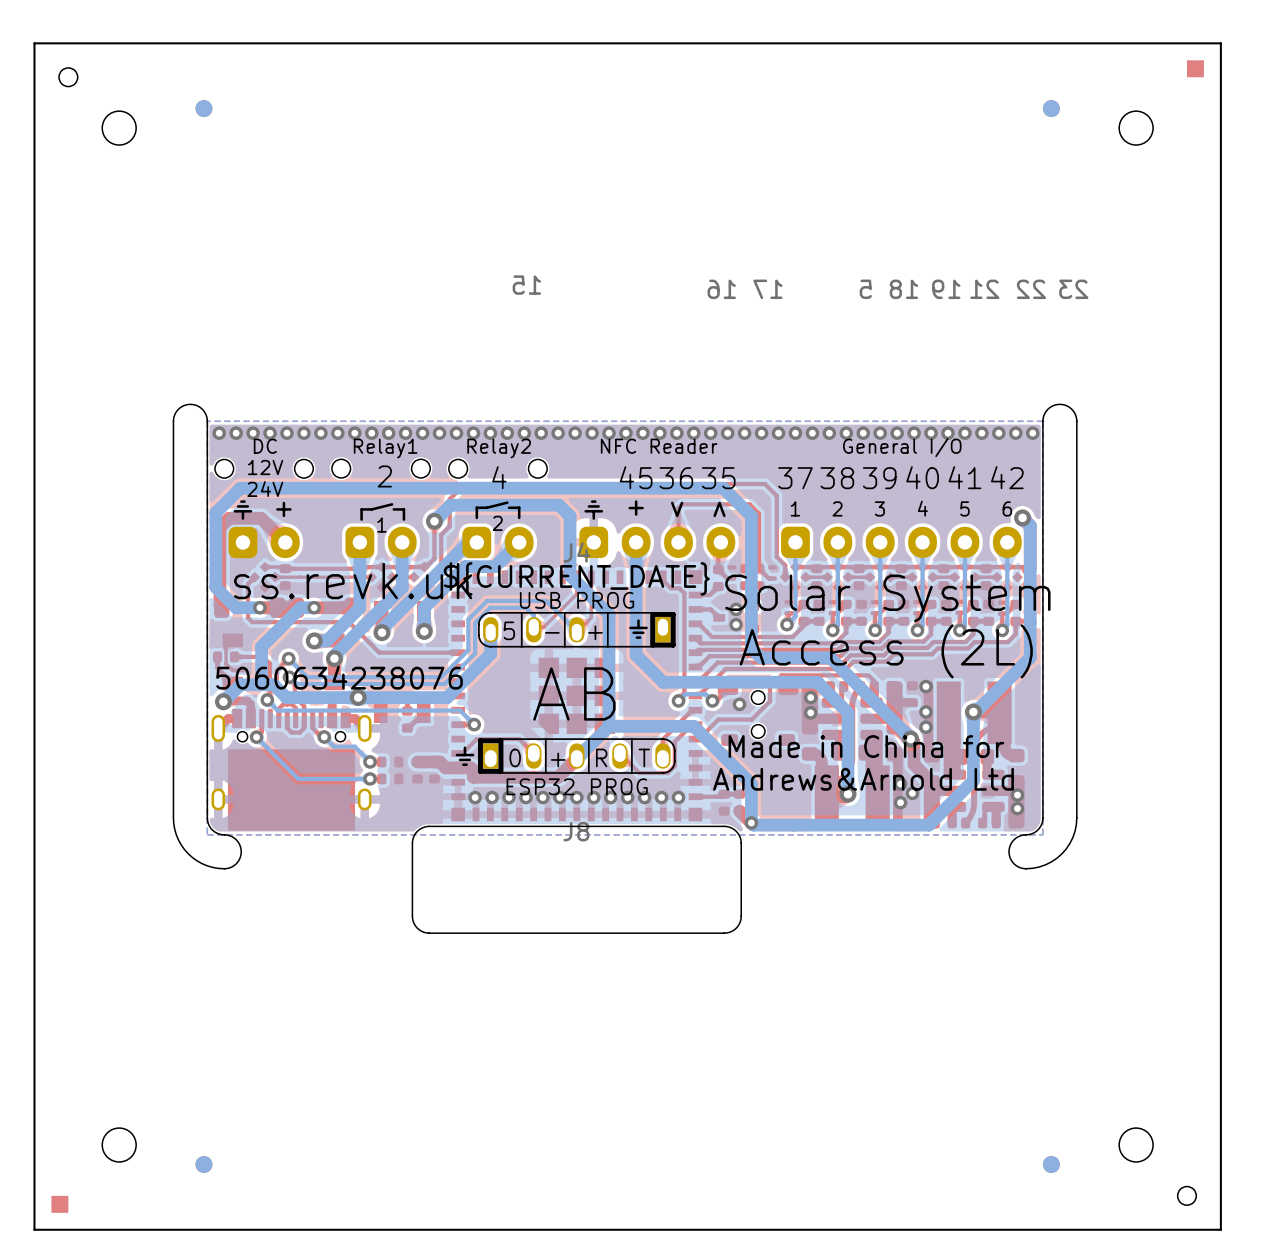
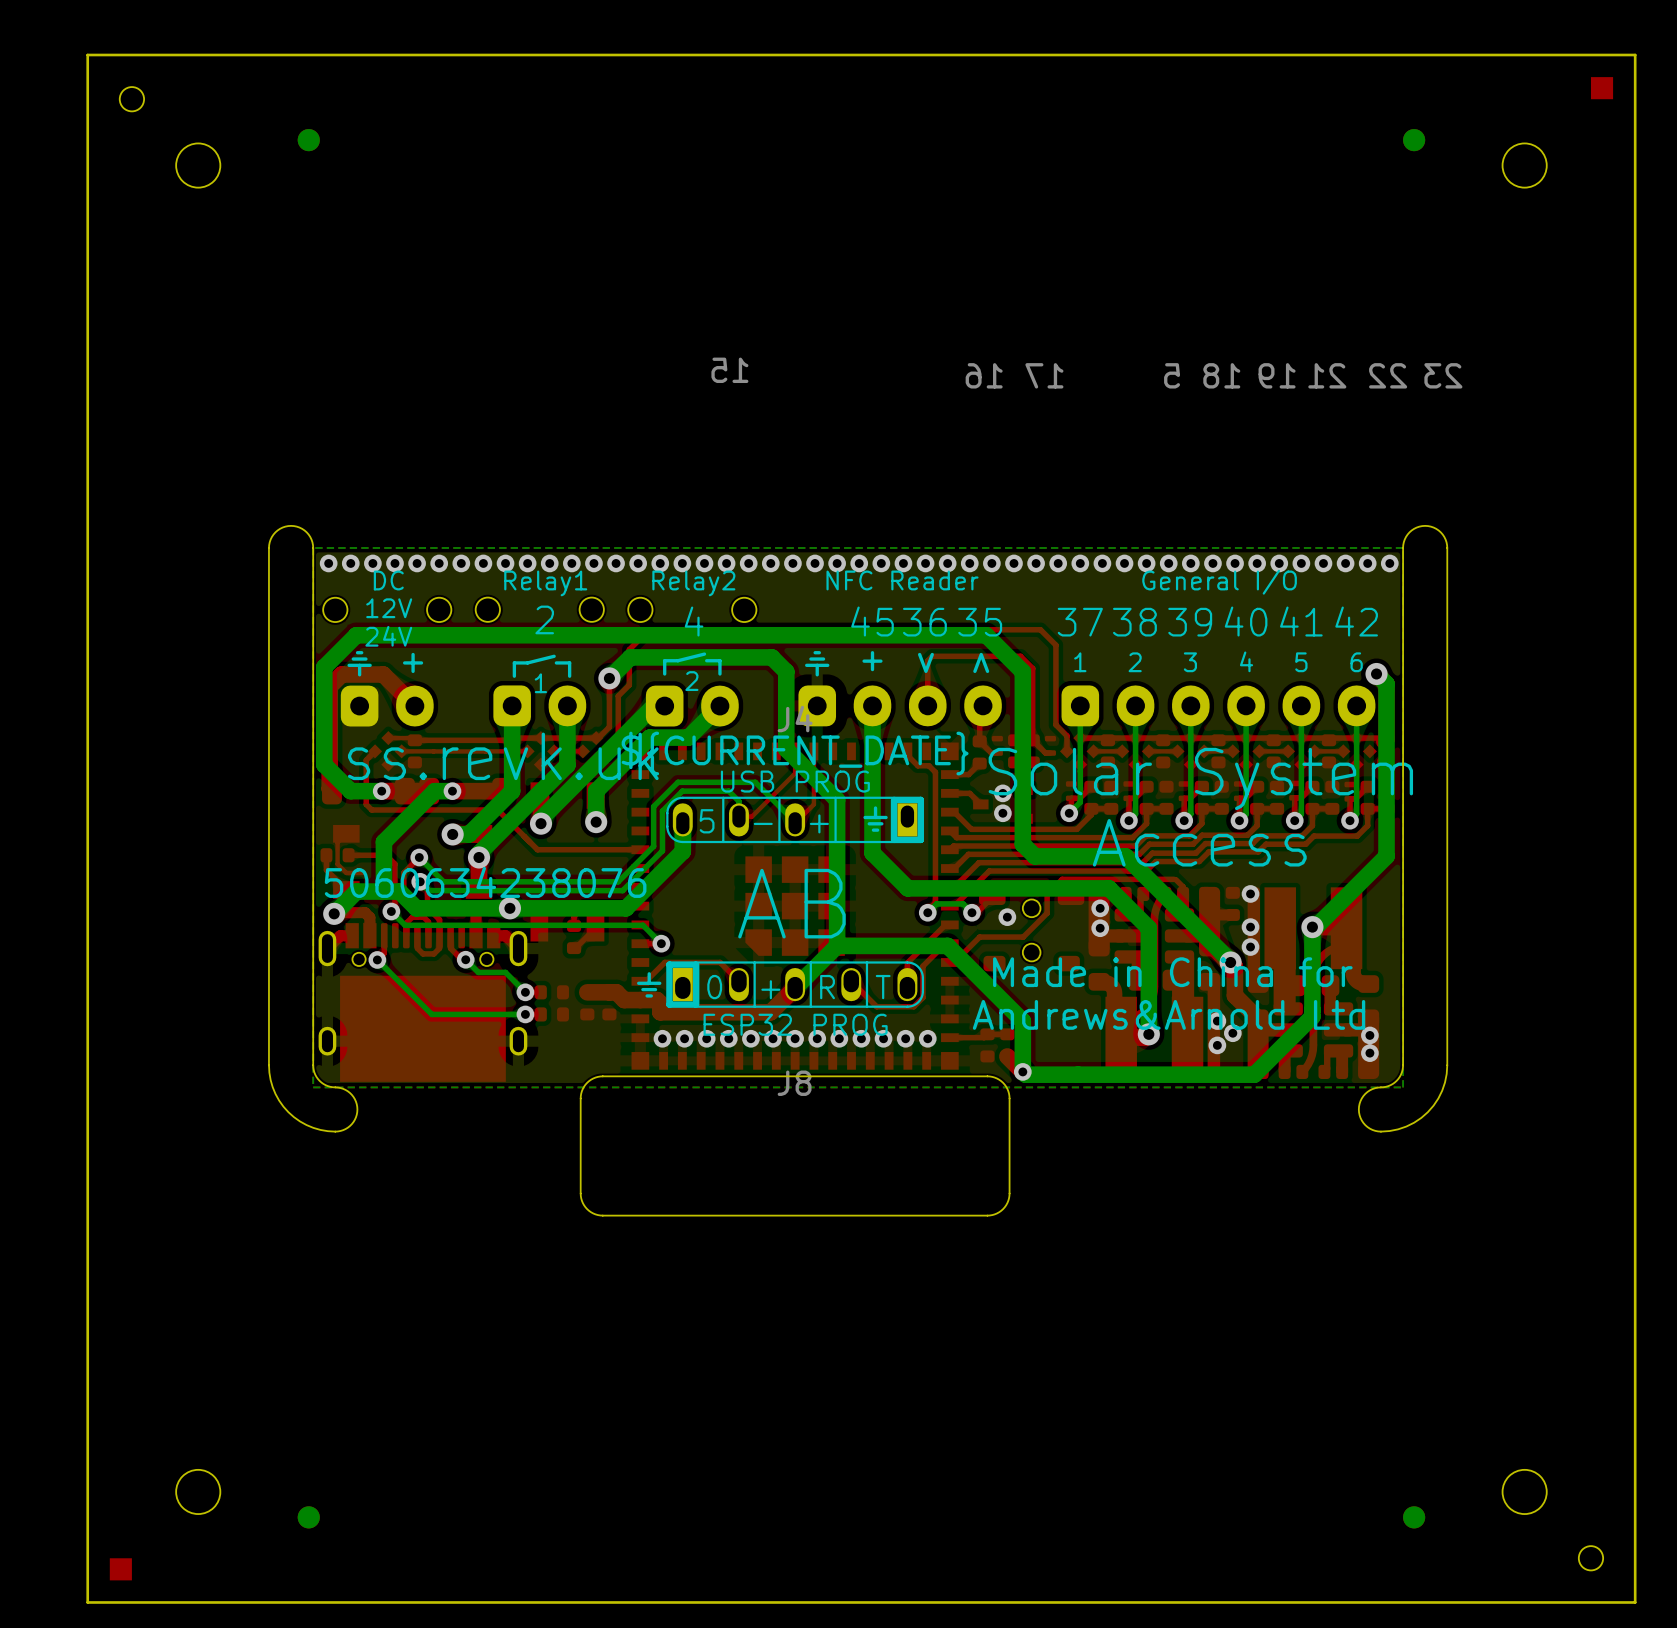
text: Access (2L) (886, 651) -> Access (1199, 842)

